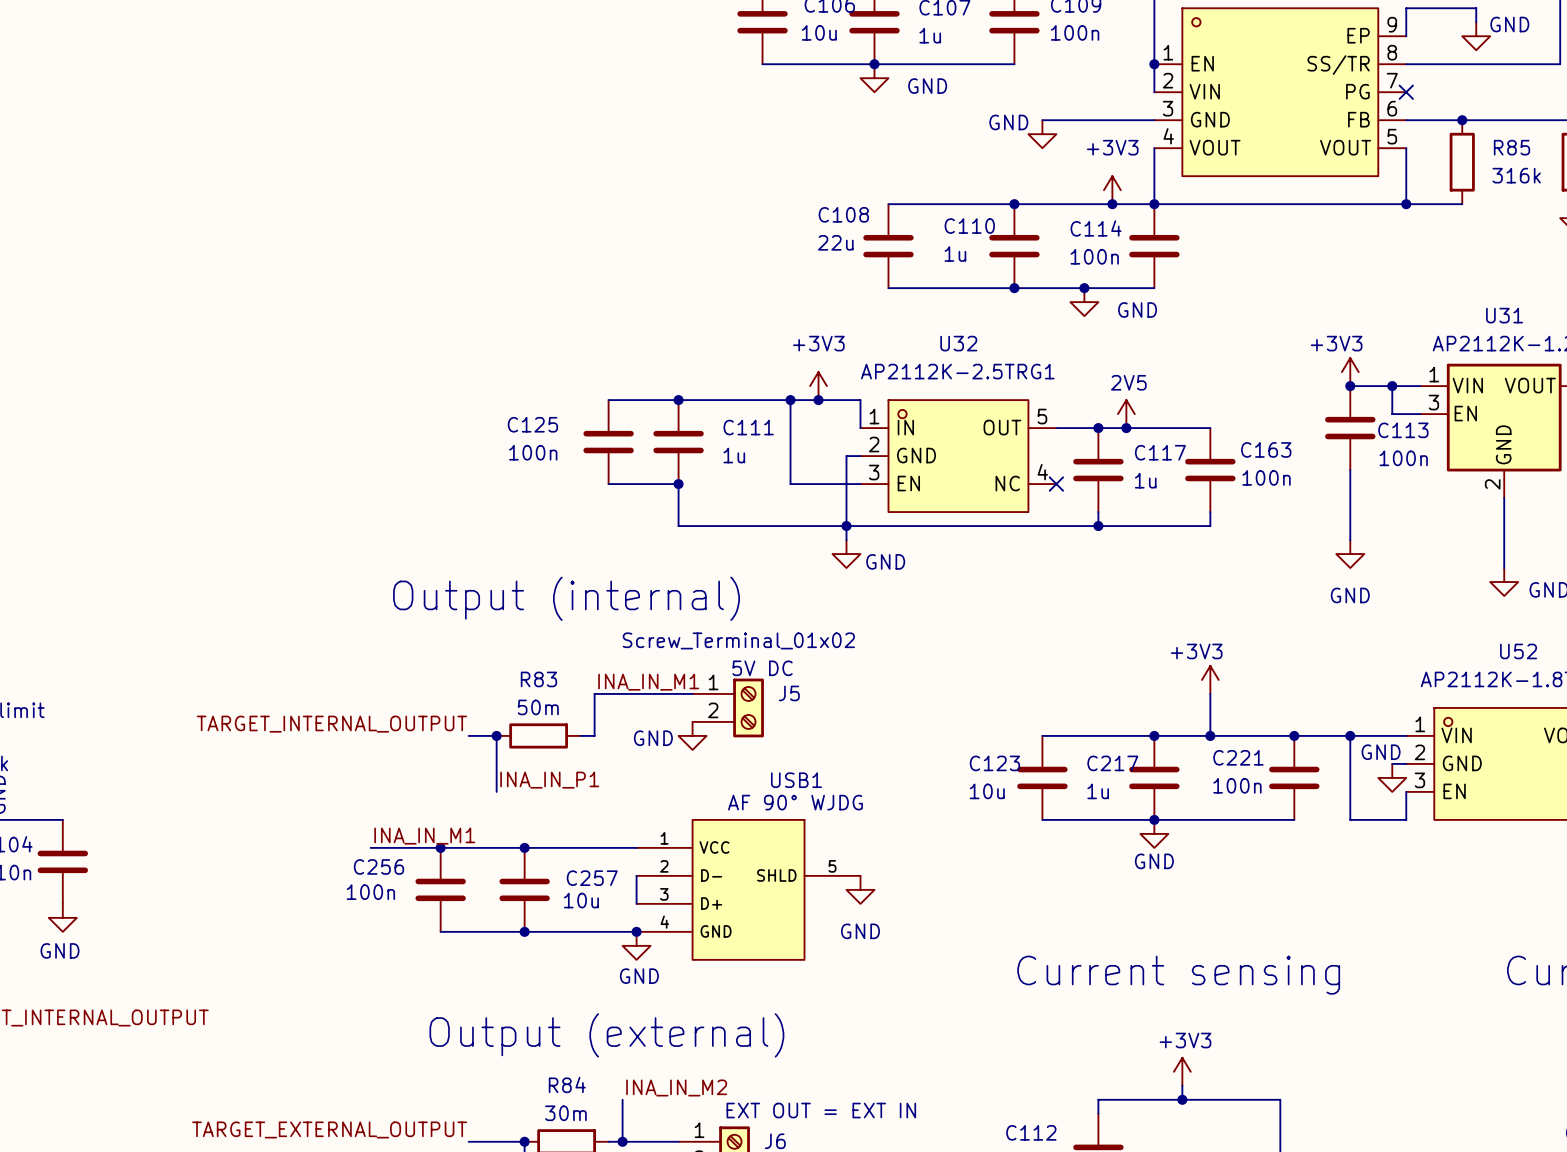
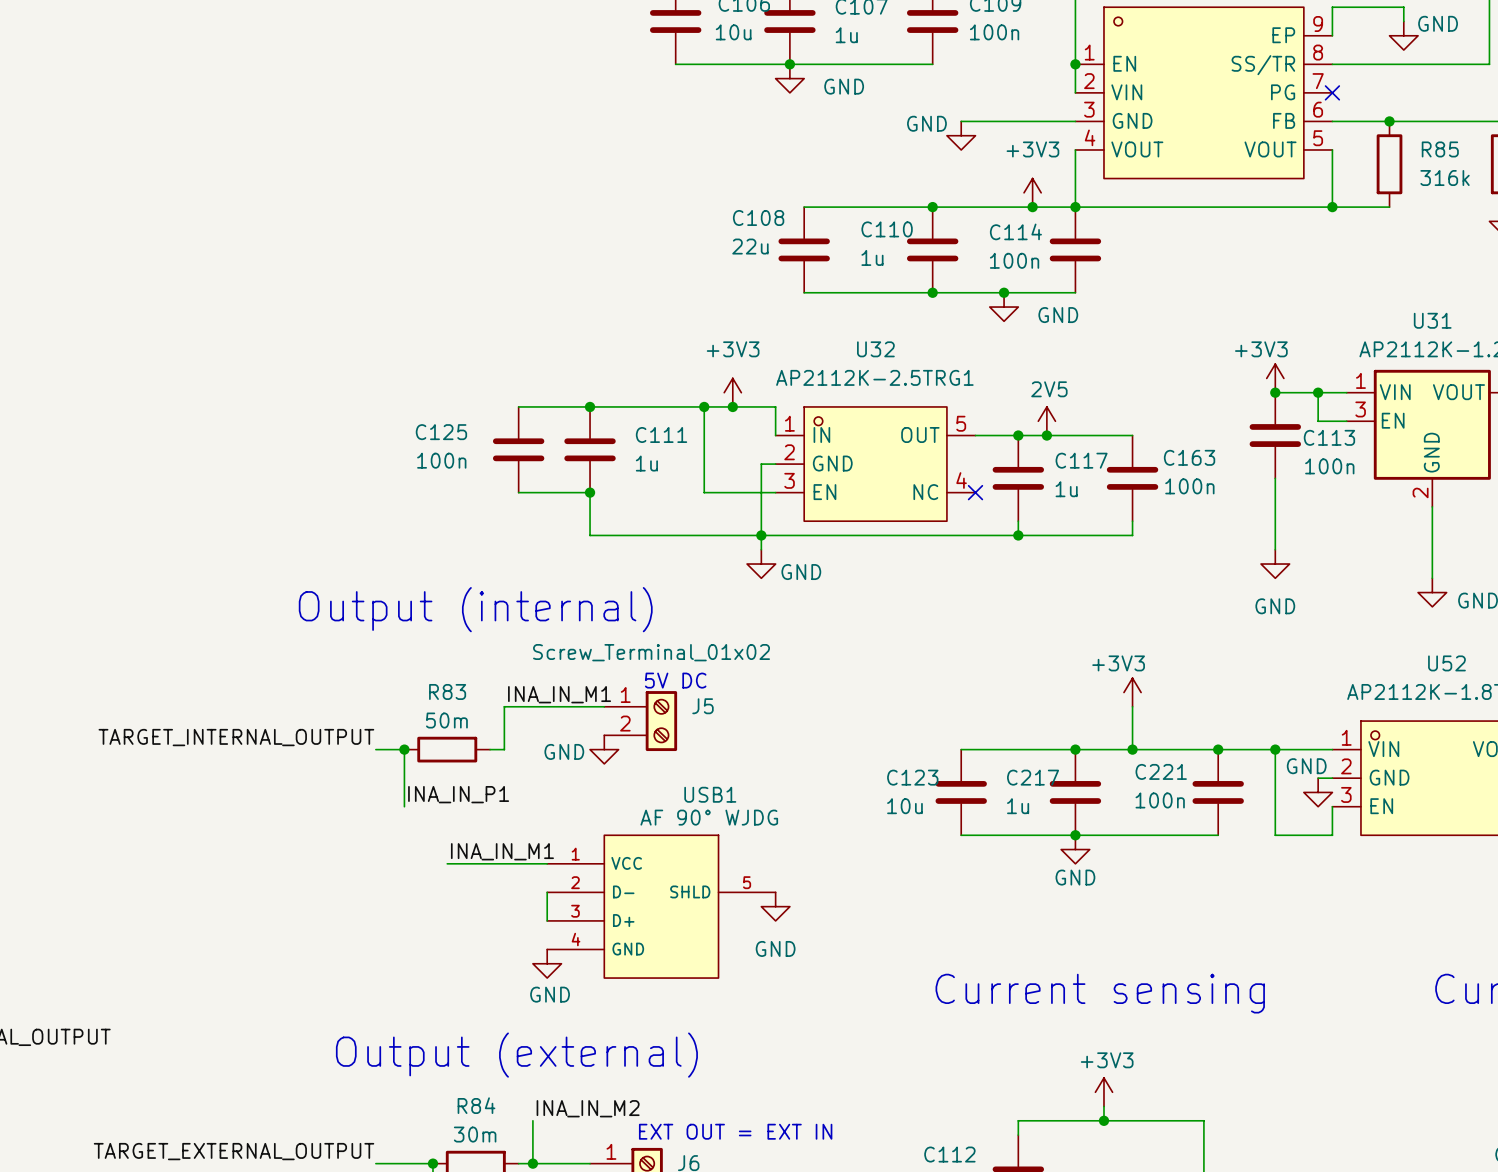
label position: INA_IN_M1 (424, 836) -> INA_IN_M1 (502, 851)
wire: (370, 847) (538, 847) -> none
junction: (440, 847) -> none
junction: (524, 847) -> none
C256: 100n (440, 889) -> none
C257: 10u (524, 889) -> none
wire: (440, 931) (636, 931) -> none
junction: (524, 931) -> none
junction: (636, 931) -> none

